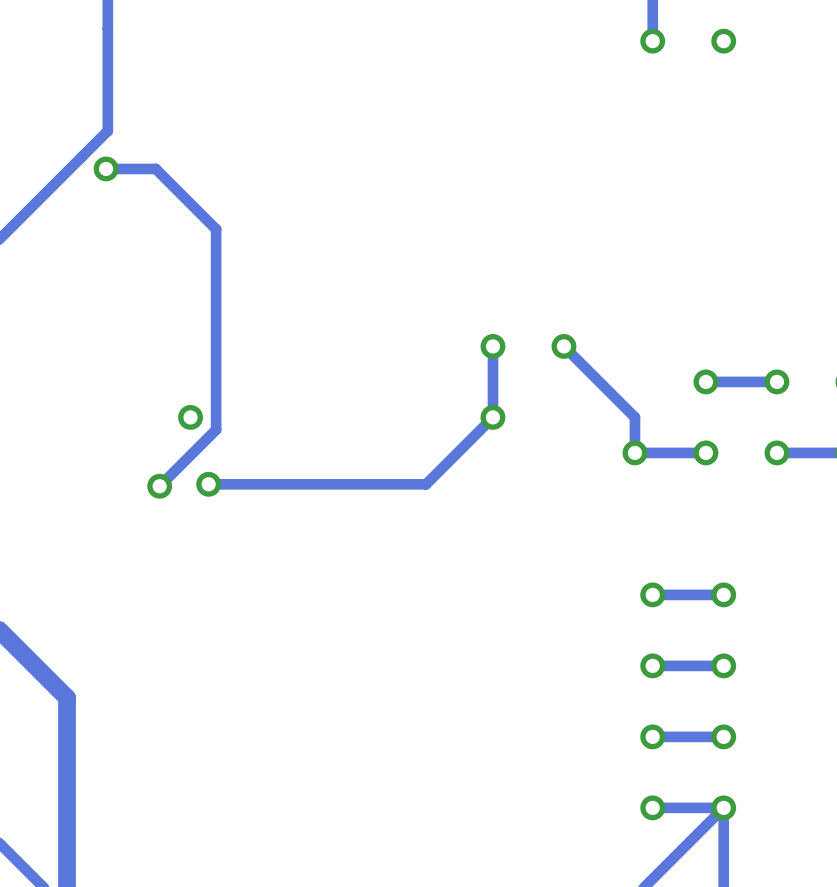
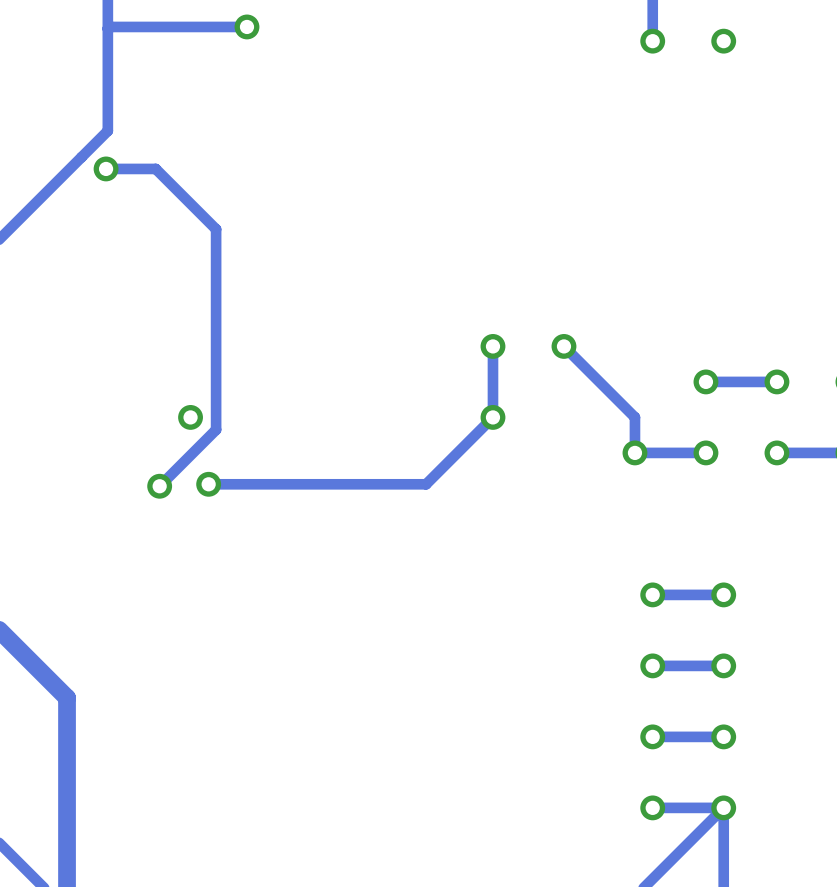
track: none -> (246, 26) (109, 26) (107, 28)
via: none -> (246, 26)

